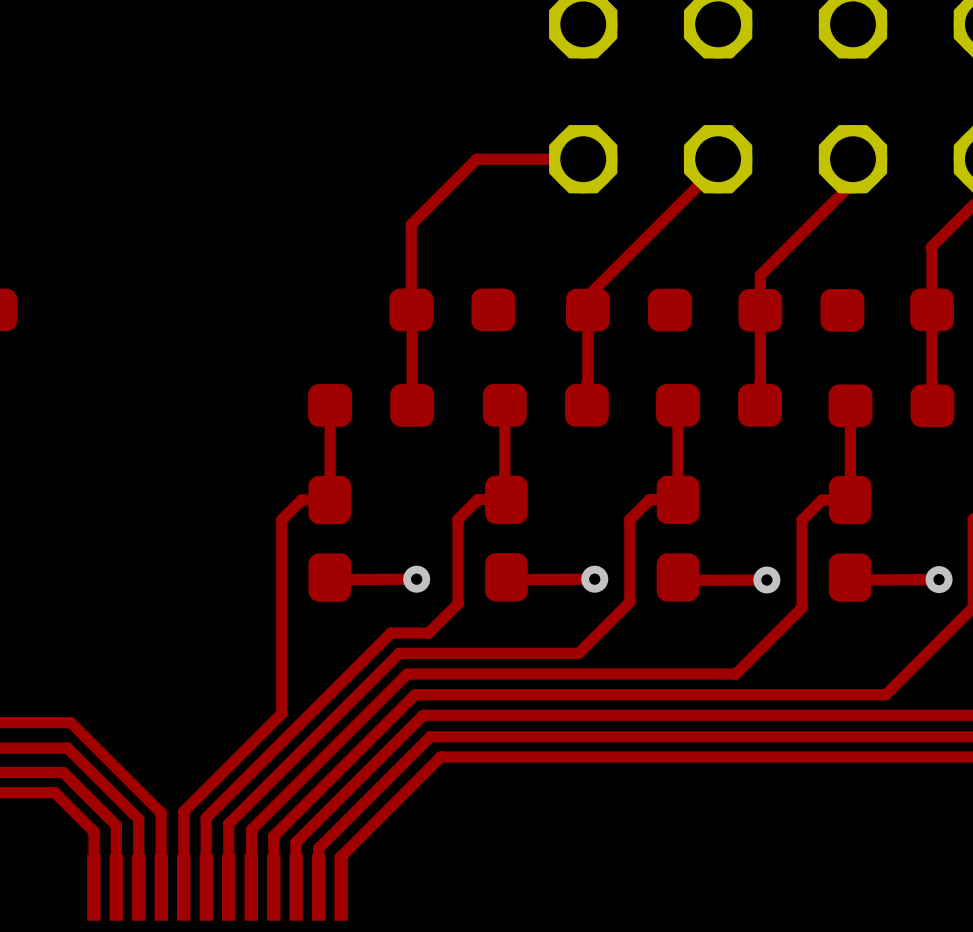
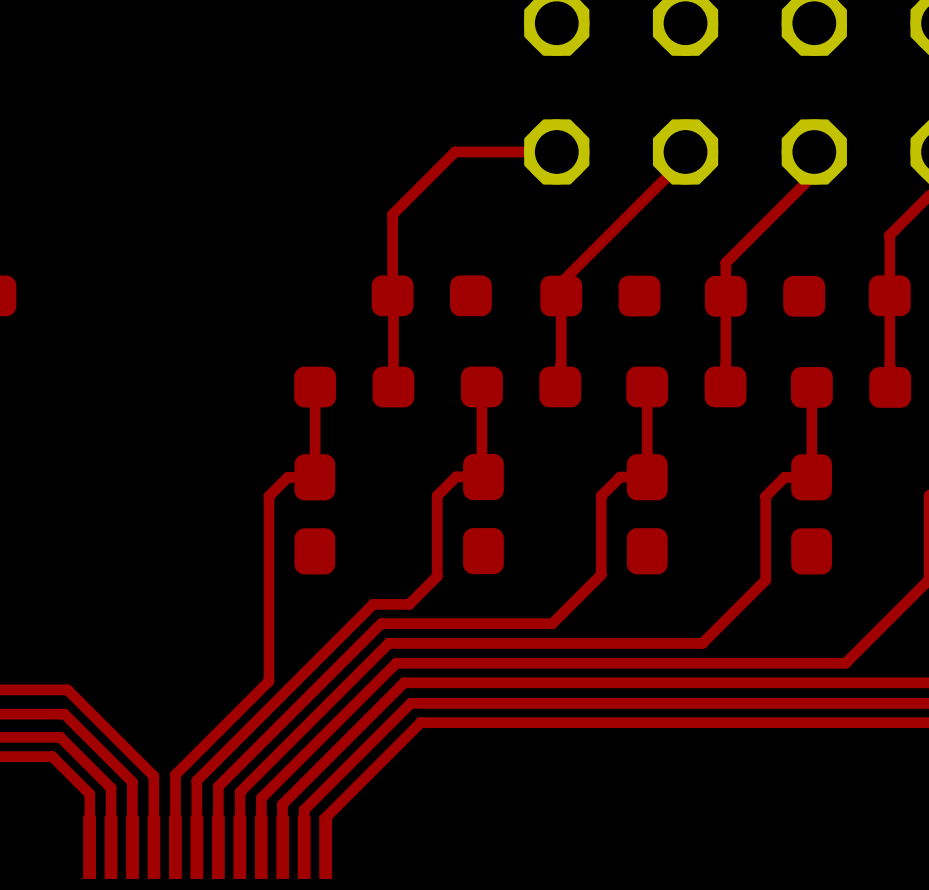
top track: (416, 579) (330, 579) -> none
via: (416, 579) -> none
top track: (594, 579) (508, 579) -> none
via: (594, 579) -> none
top track: (766, 579) (680, 580) -> none
via: (766, 579) -> none
top track: (939, 579) (852, 580) -> none
via: (939, 579) -> none

